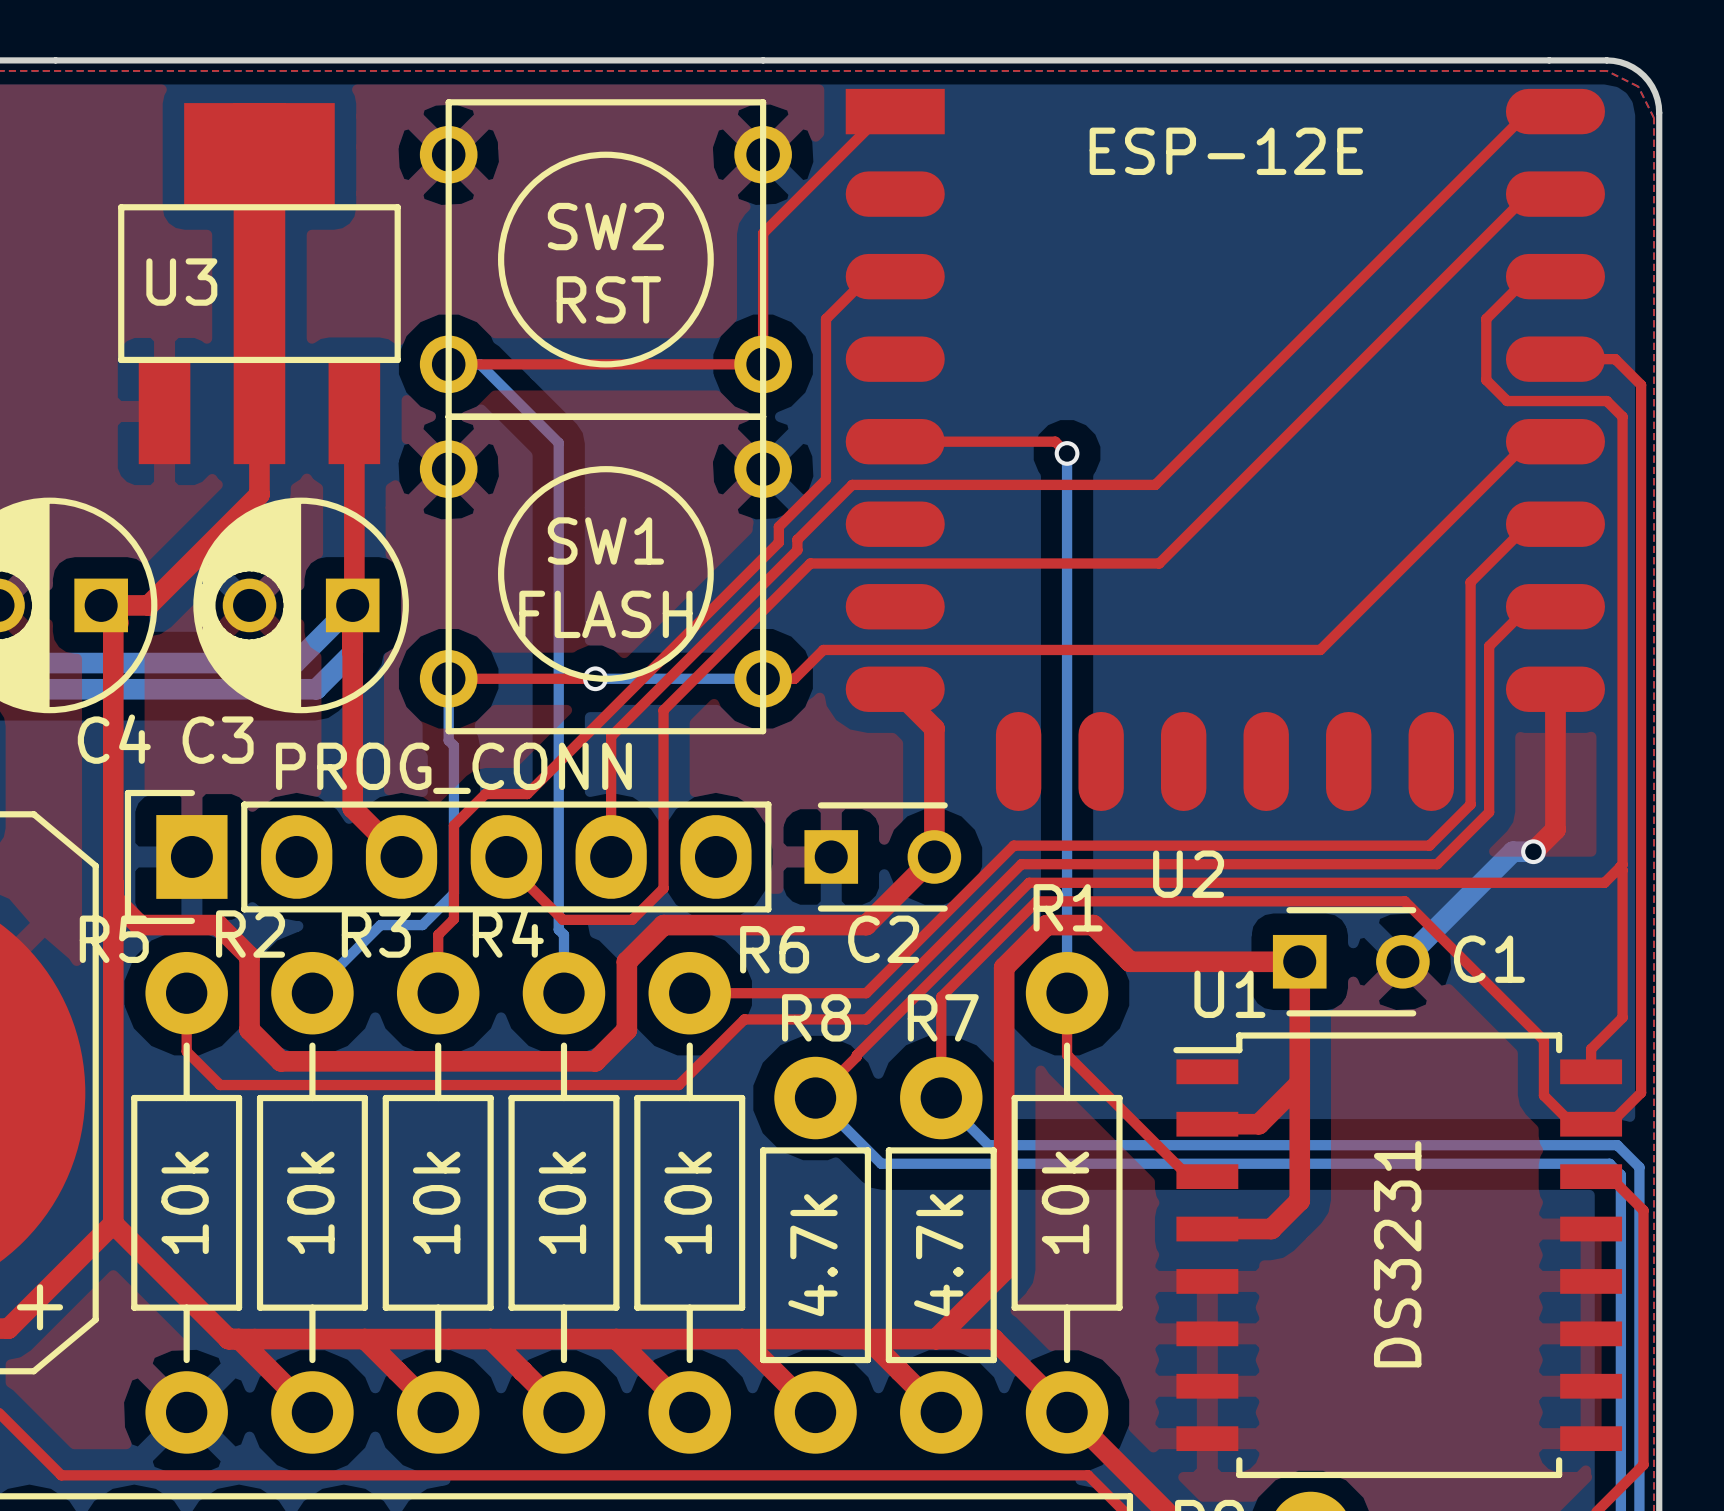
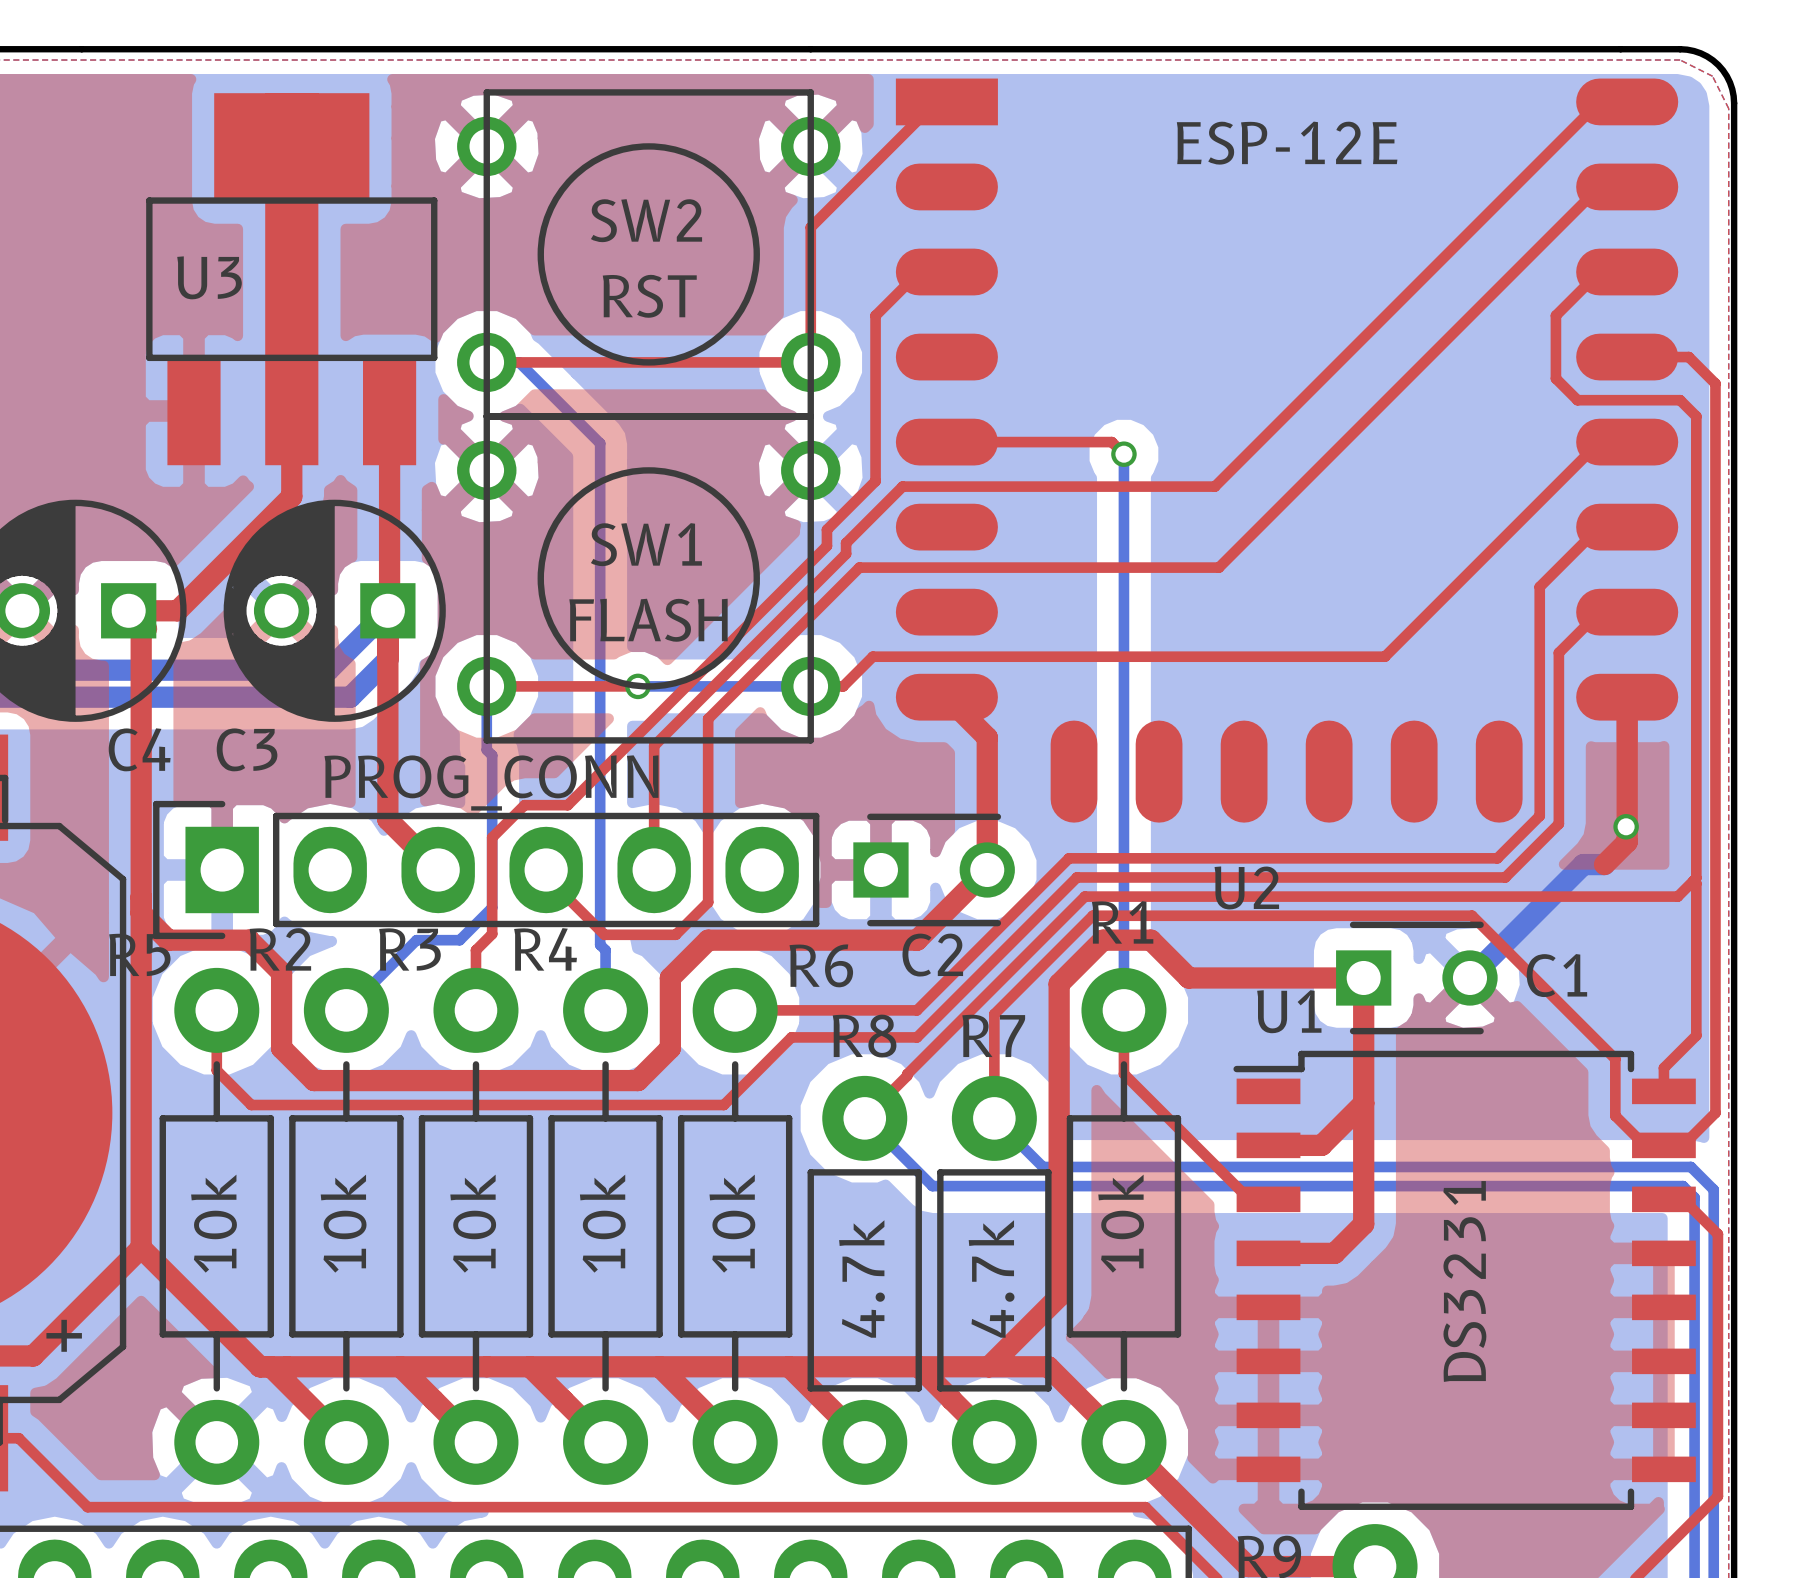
via position: (1533, 851) -> (1626, 826)

